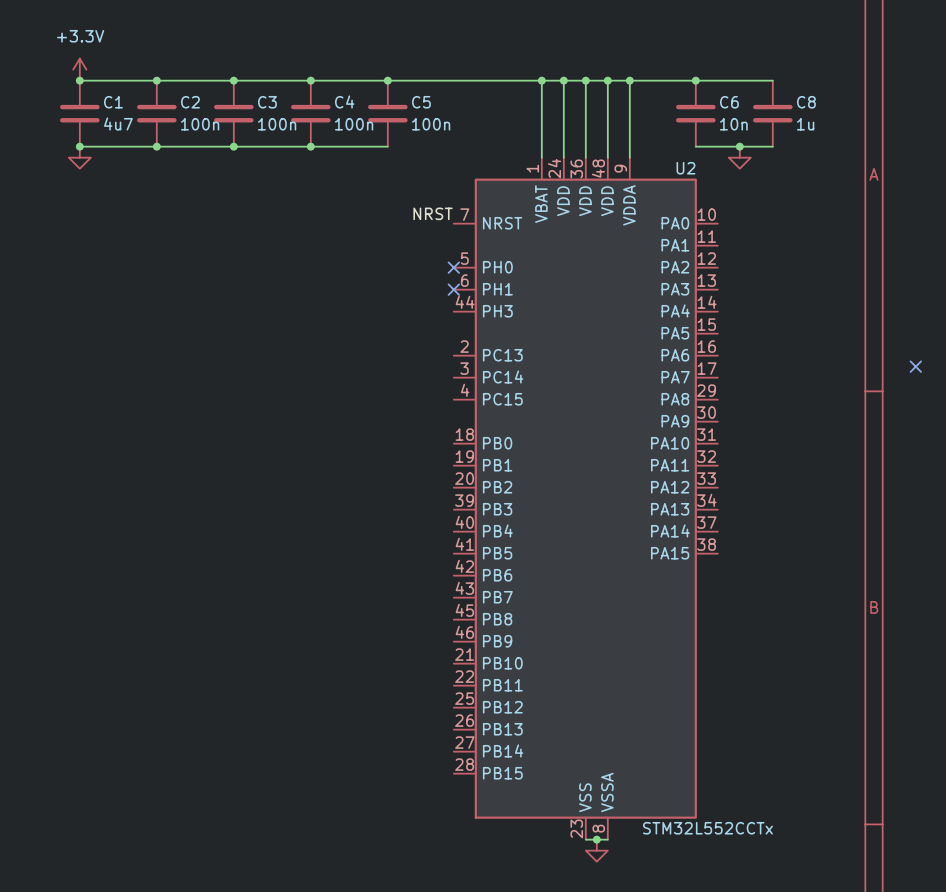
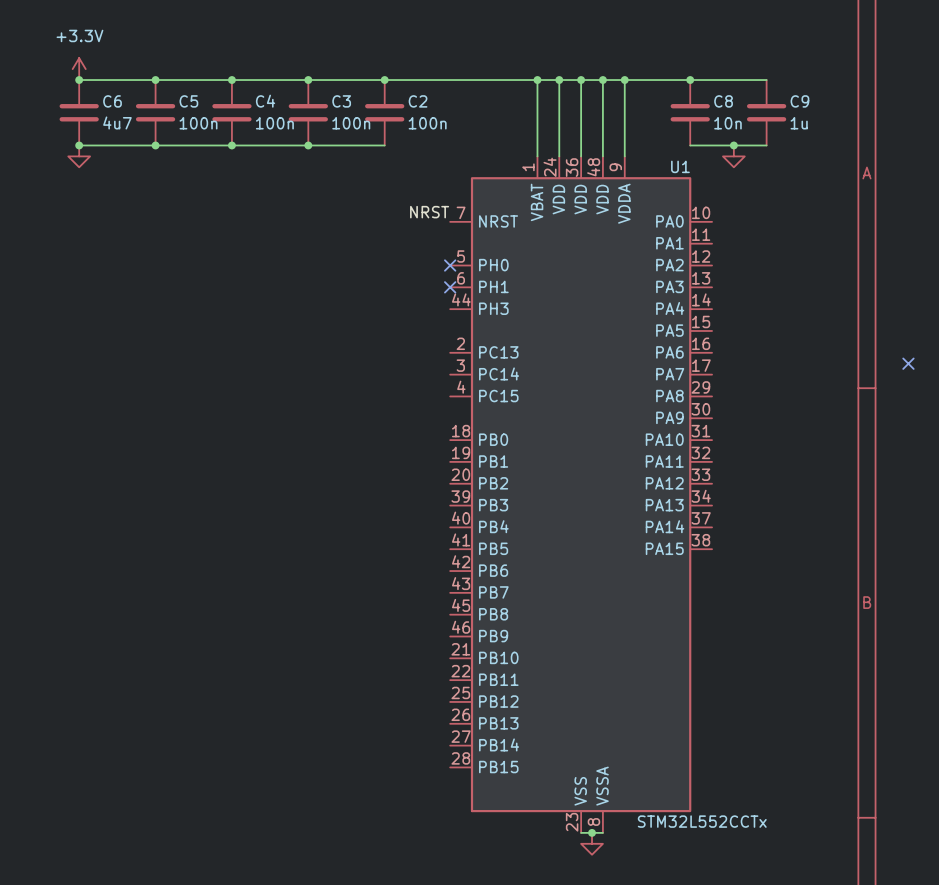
C4 name: C4 (344, 101) -> C3 (341, 101)
C1 name: C1 (113, 102) -> C6 (112, 101)
C2 name: C2 (190, 102) -> C5 (188, 101)
C3 name: C3 (267, 102) -> C4 (265, 101)
C5 name: C5 (421, 102) -> C2 (418, 101)
C6 name: C6 (729, 102) -> C8 (723, 101)
C8 name: C8 (806, 102) -> C9 (799, 101)
U2 name: U2 (685, 168) -> U1 (680, 166)

